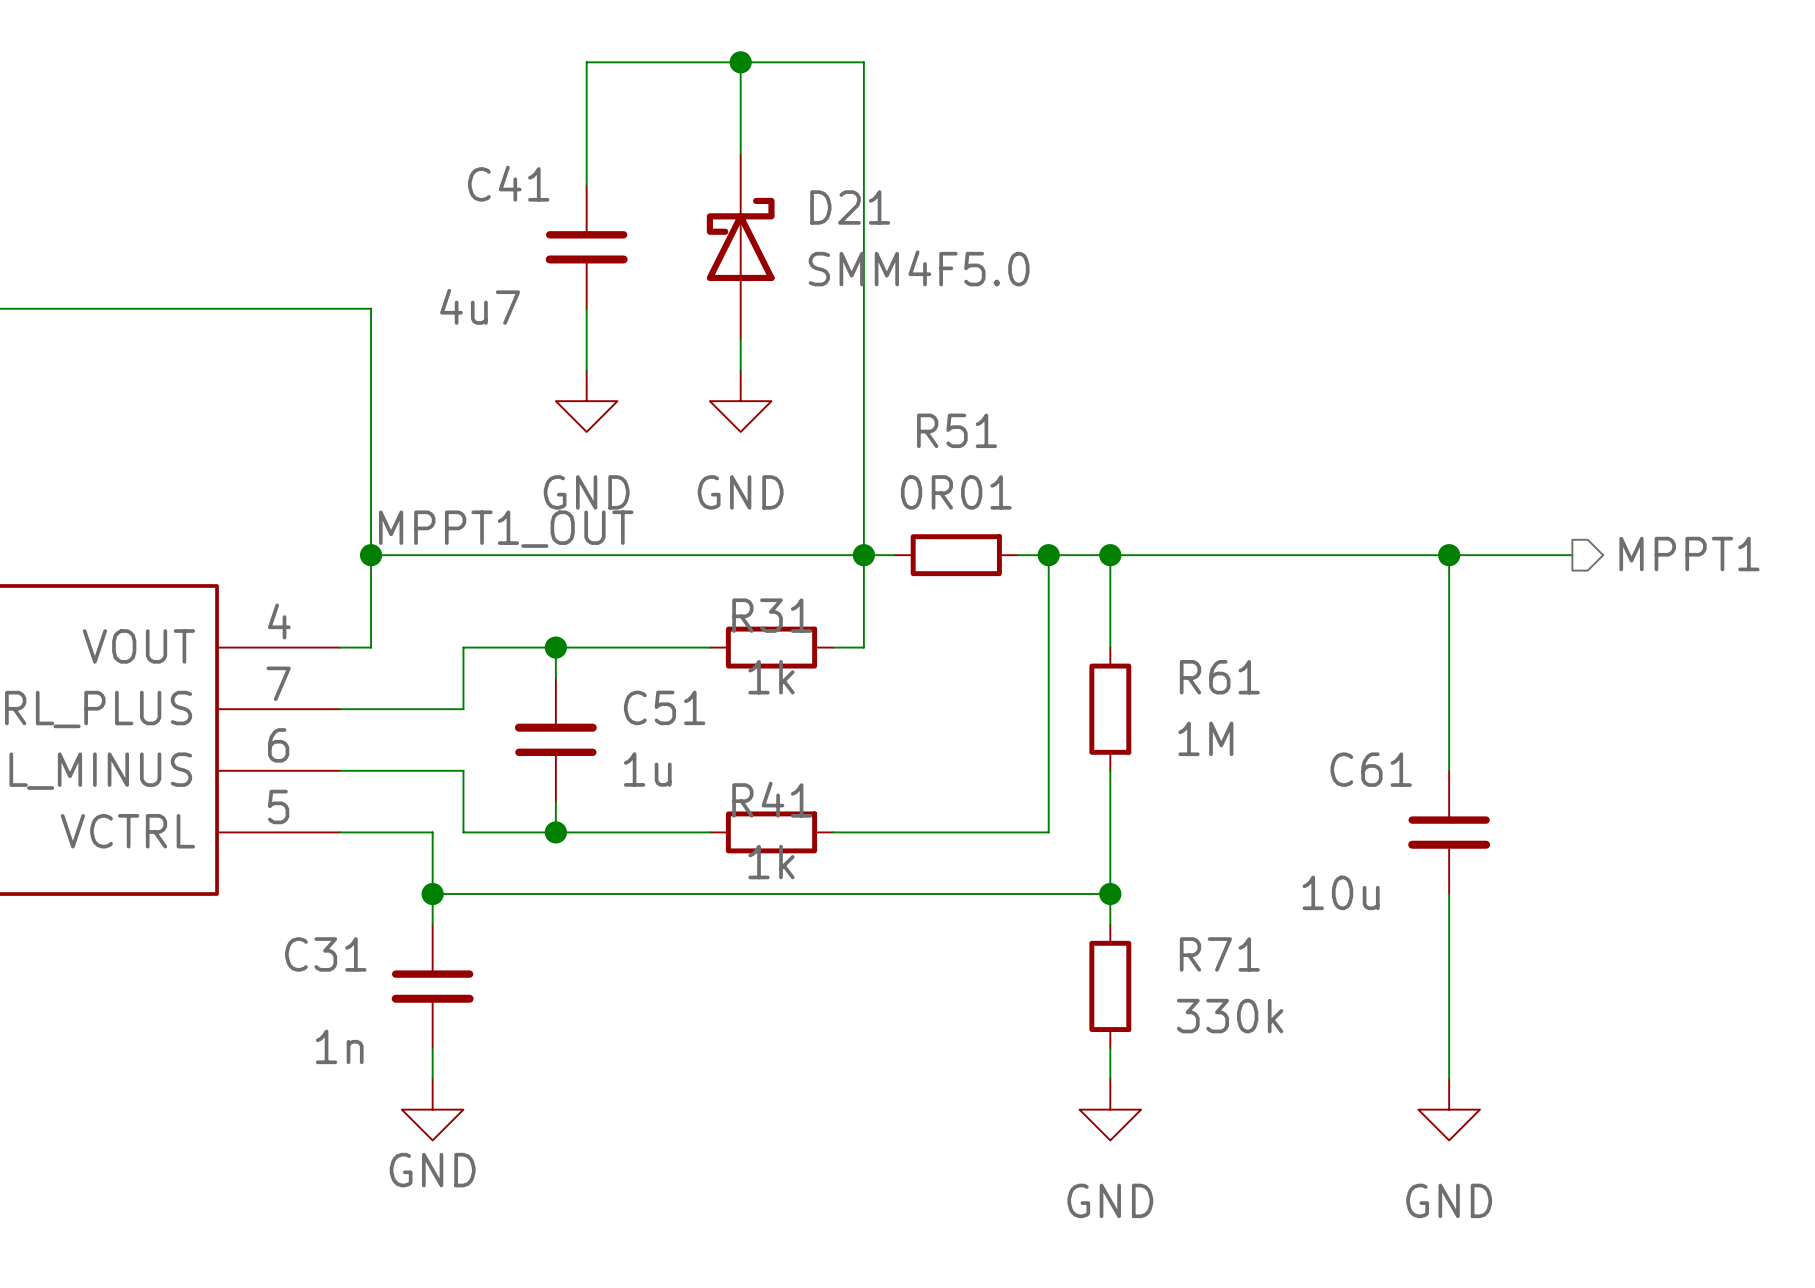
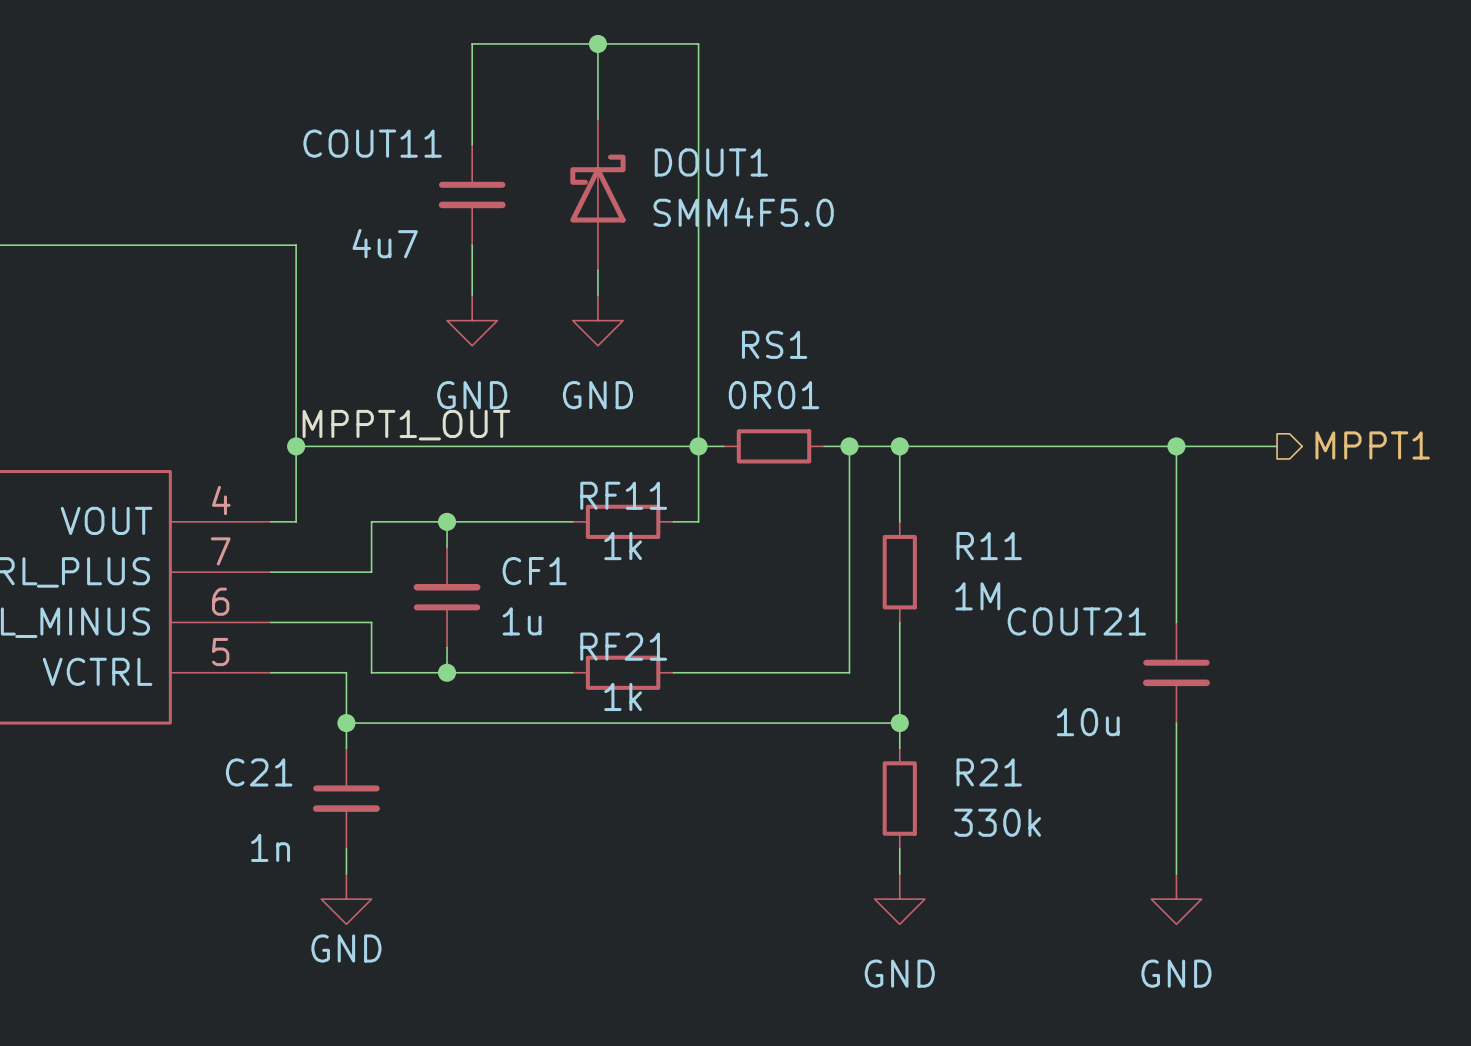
C41 name: C41 (508, 183) -> COUT11 (372, 143)
D21 name: D21 (850, 207) -> DOUT1 (711, 162)
R51 name: R51 (957, 430) -> RS1 (774, 344)
R31 name: R31 (772, 615) -> RF11 (623, 495)
R61 name: R61 (1219, 677) -> R11 (989, 546)
C51 name: C51 (664, 707) -> CF1 (534, 571)
C61 name: C61 (1371, 769) -> COUT21 (1076, 621)
R41 name: R41 (772, 799) -> RF21 (623, 646)
C31 name: C31 (325, 954) -> C21 (259, 772)
R71 name: R71 (1219, 954) -> R21 (989, 772)

